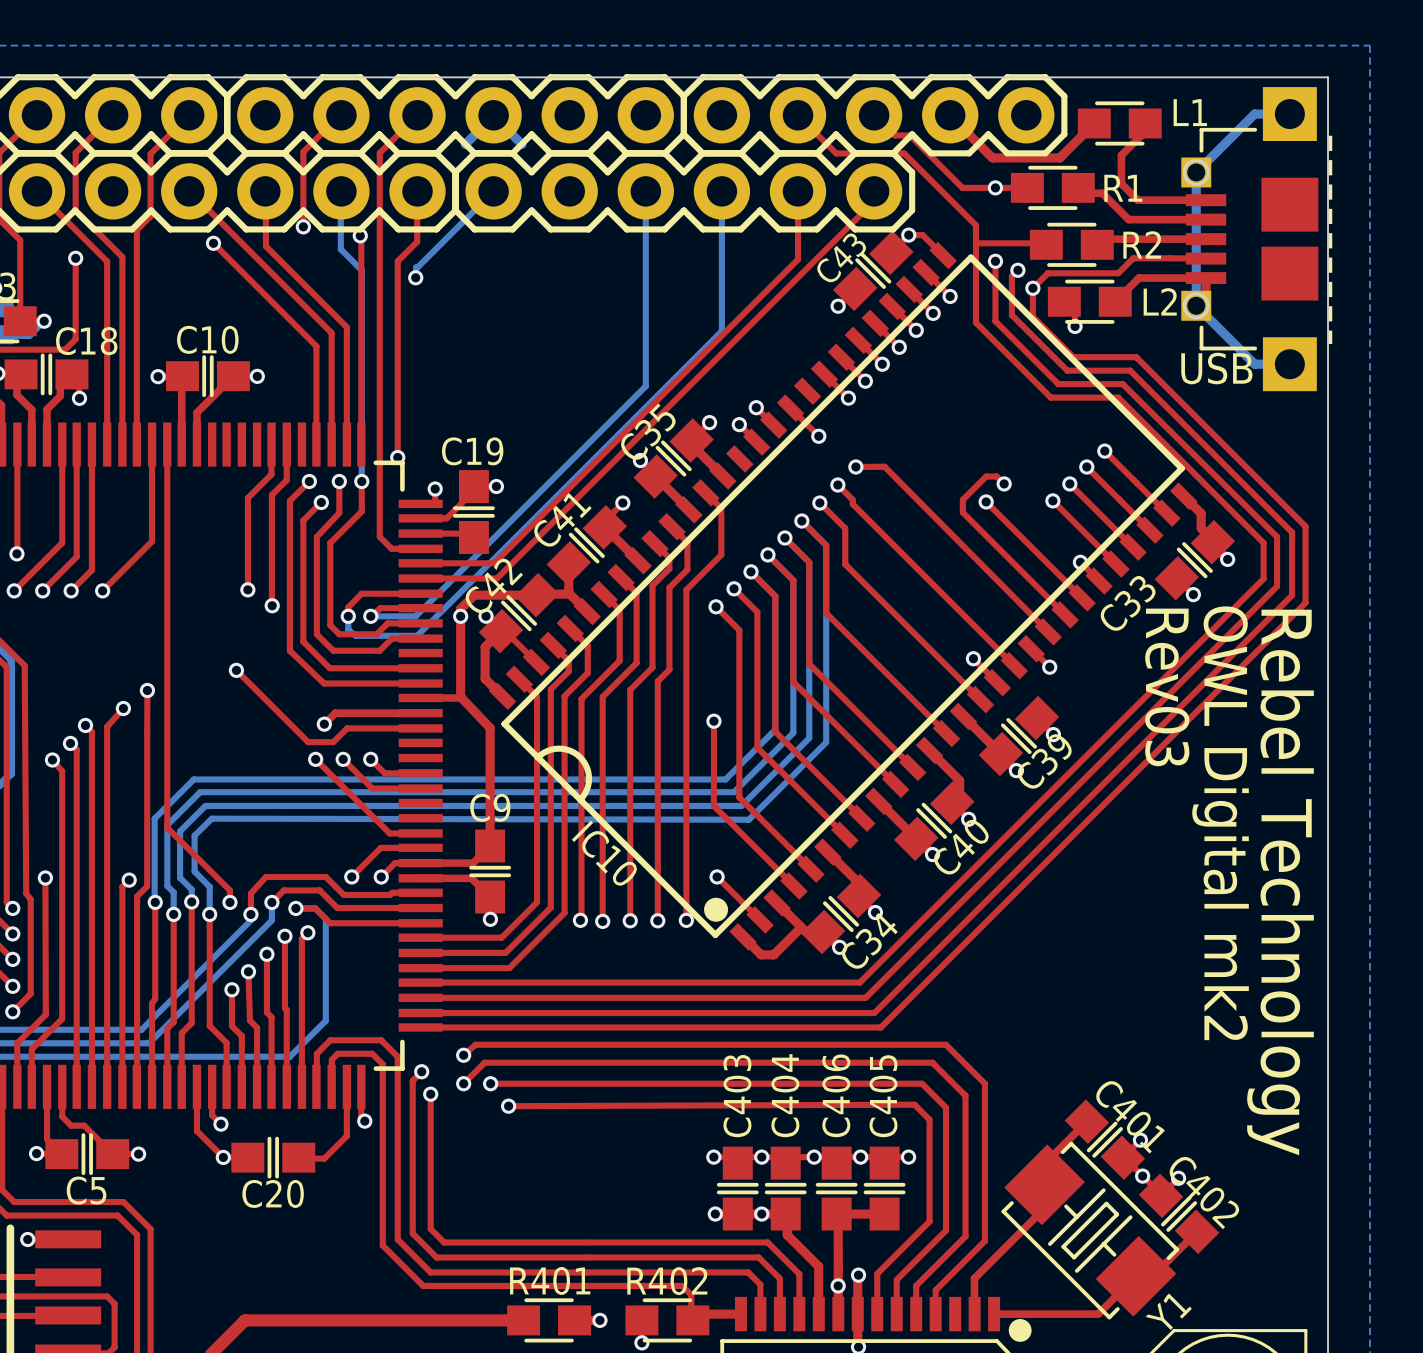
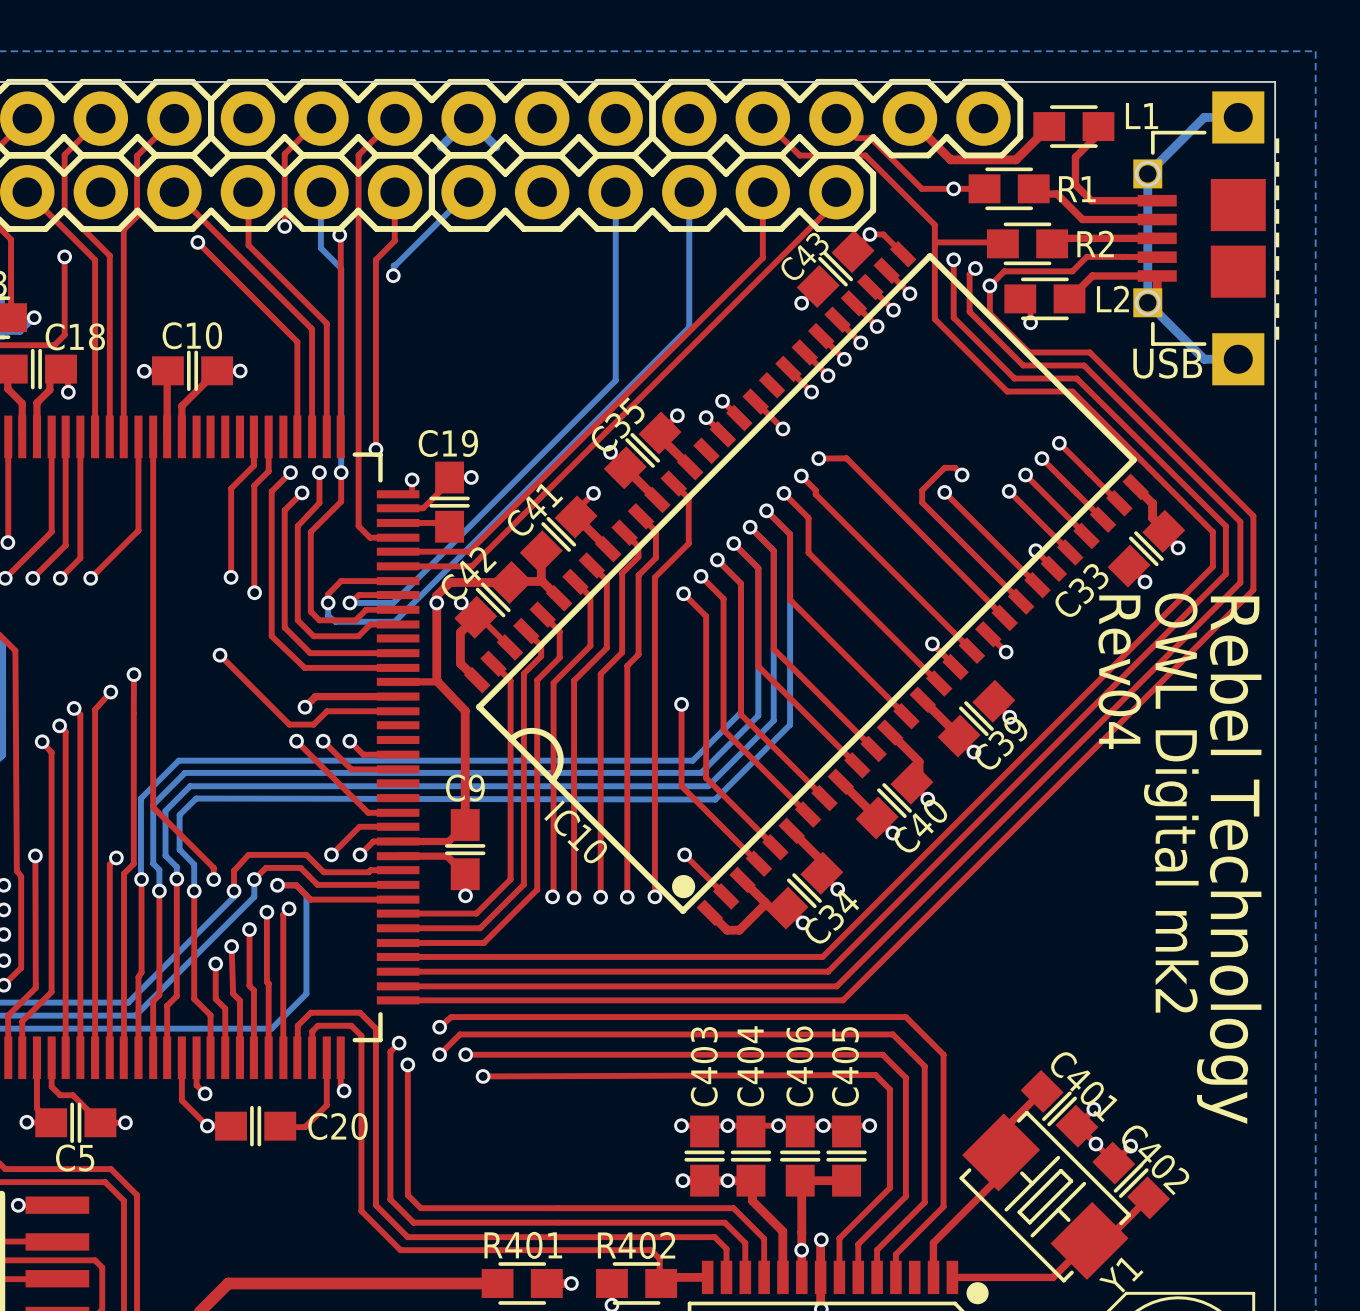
text: Rev03 (1167, 687) -> Rev04 (1119, 672)
C20 name position: C20 (273, 1193) -> C20 (338, 1126)

